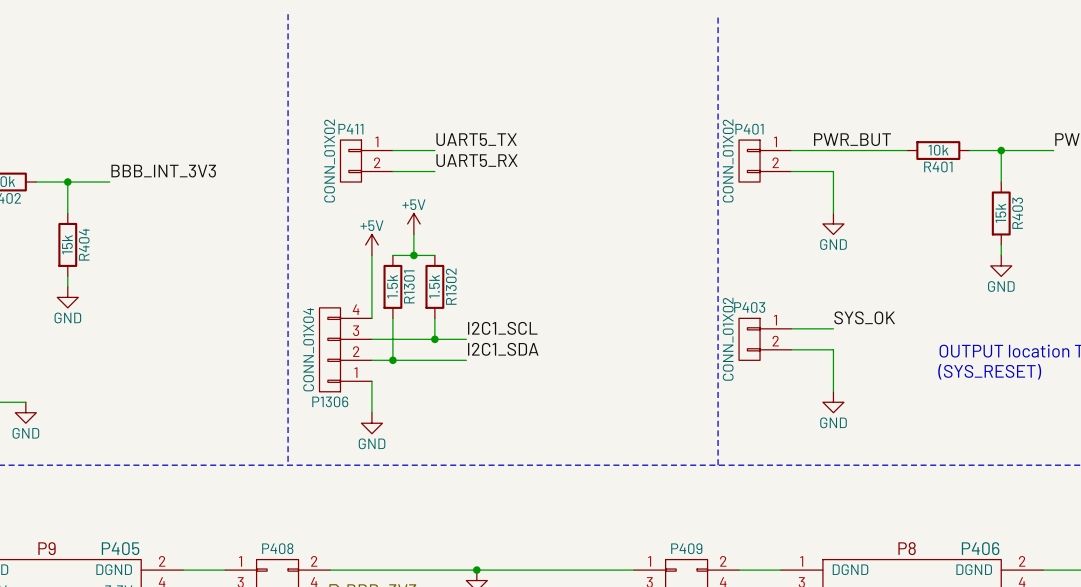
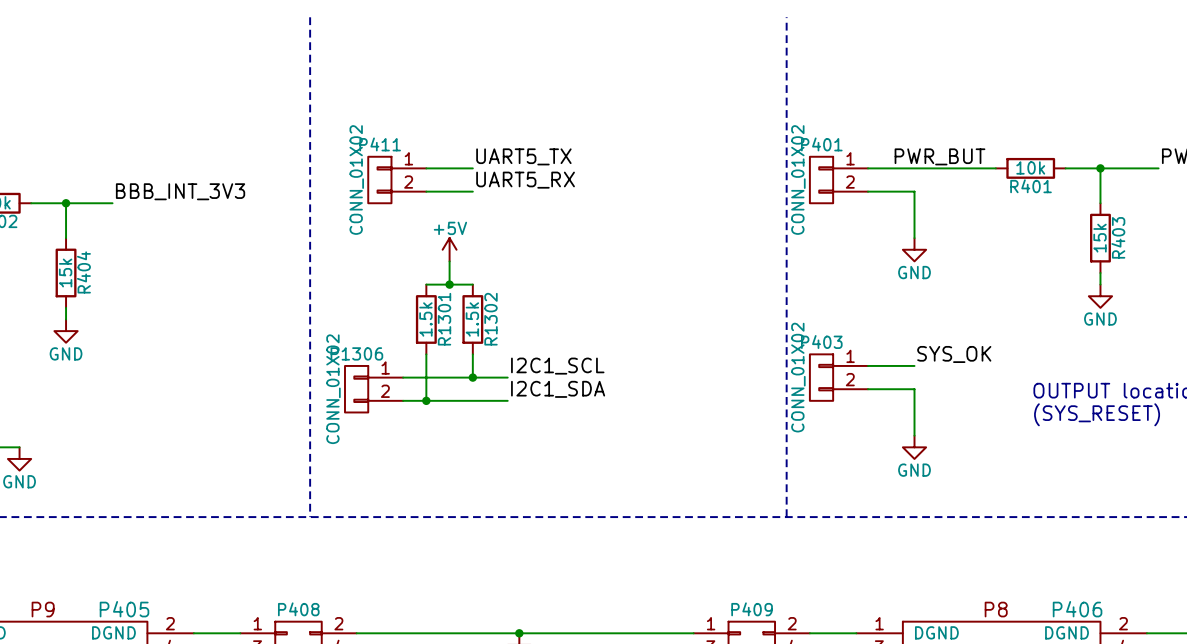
power symbol: +5V (371, 244) -> none
wire: (371, 255) (371, 318) -> none
P1306 symbol: [319, 307, 372, 392] -> [344, 365, 404, 413]
P1306 value: CONN_01X04 (308, 349) -> CONN_01X02 (333, 389)
wire: (371, 381) (371, 412) -> none
P1306 name position: P1306 (330, 401) -> P1306 (356, 353)
power symbol: GND (371, 423) -> none

